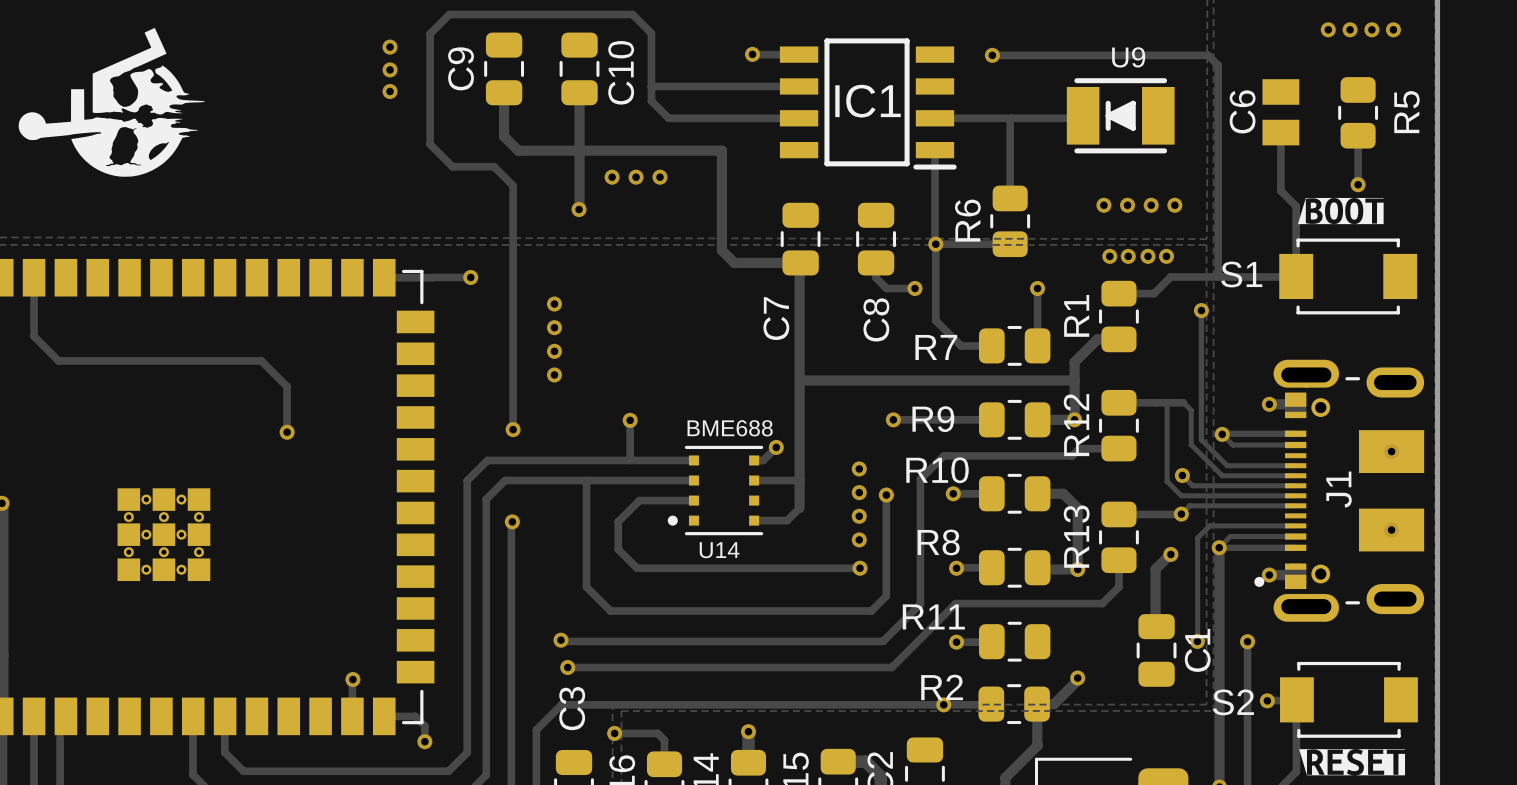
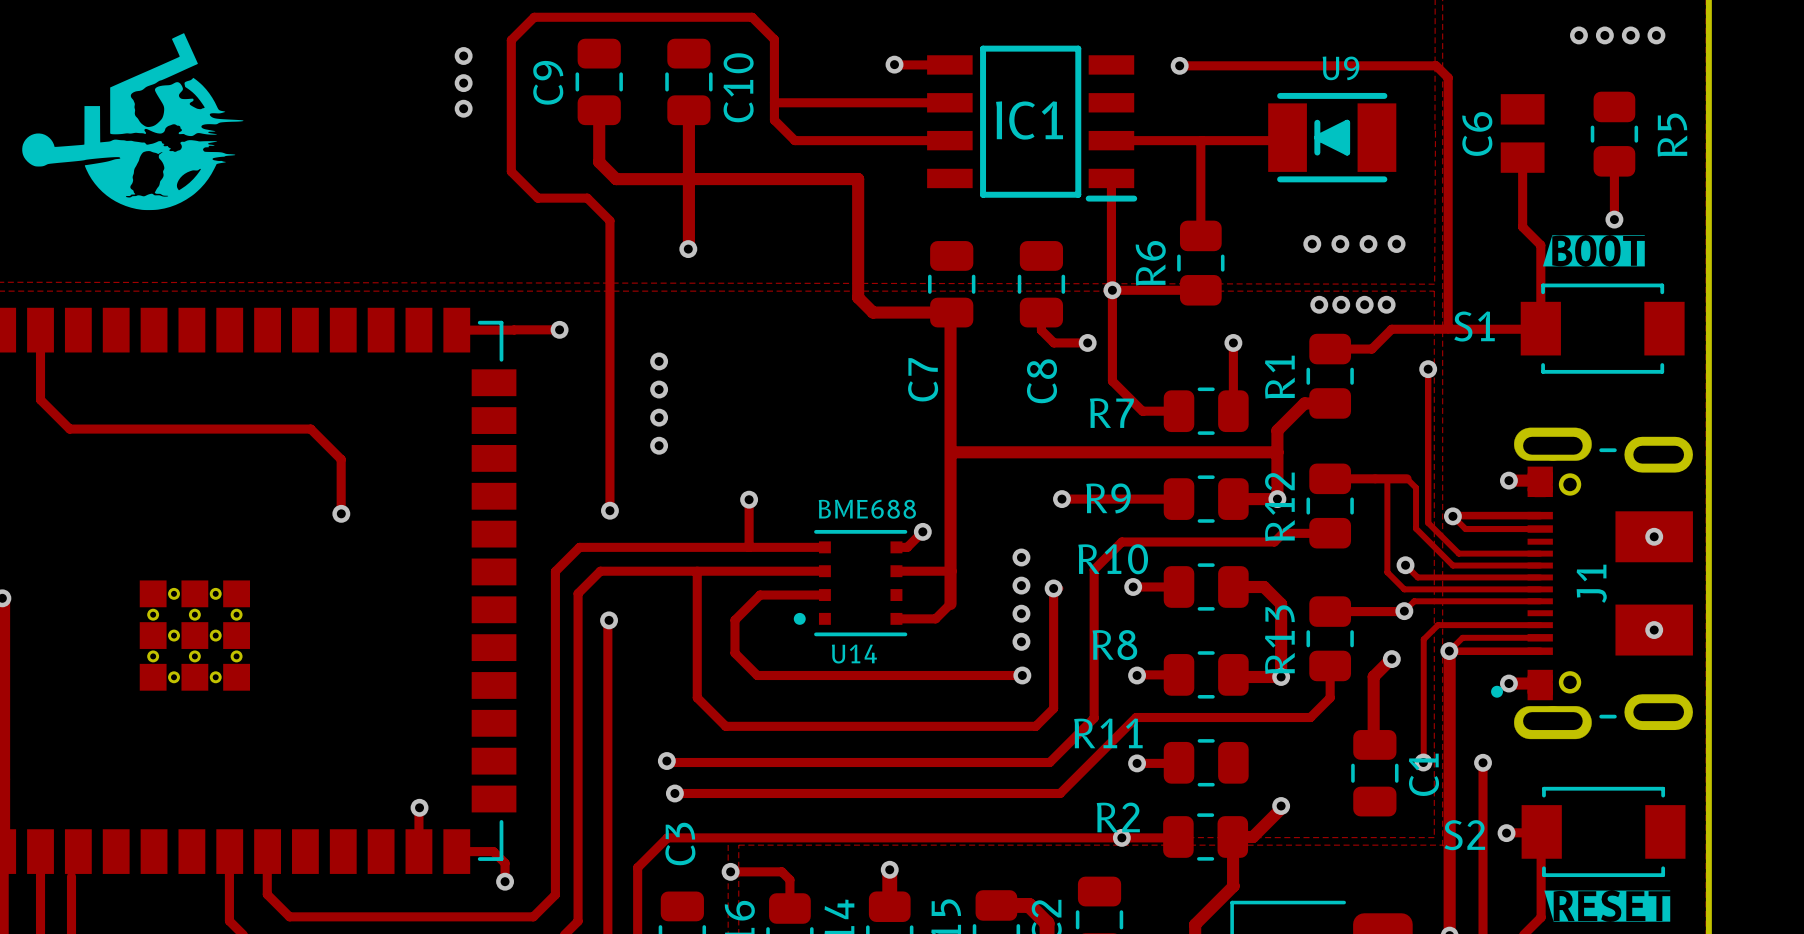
via: (612, 177) -> none
via: (636, 177) -> none
via: (659, 177) -> none

